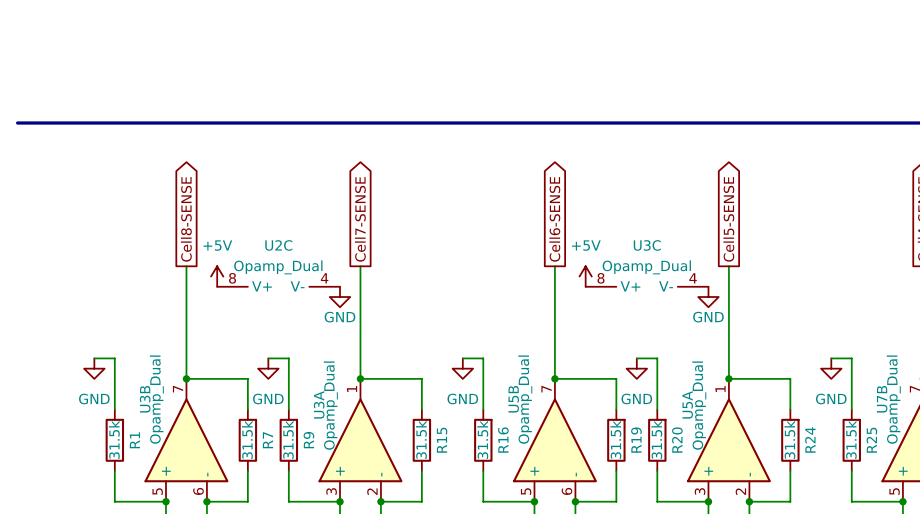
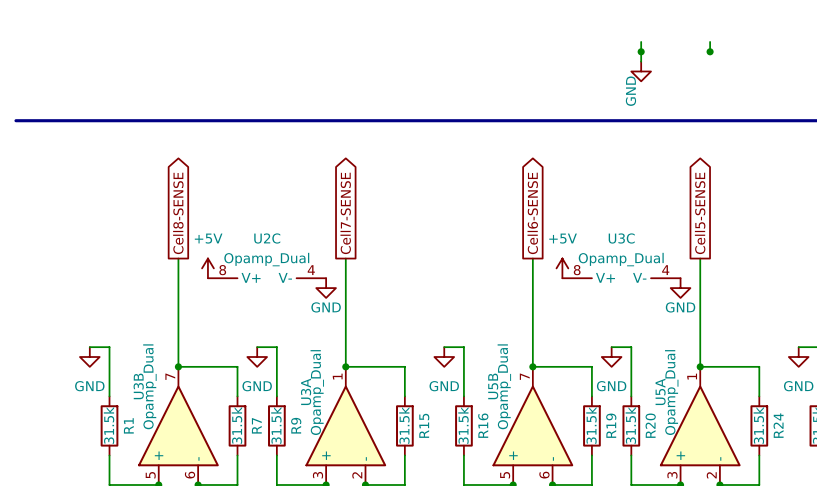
wire: none -> (641, 41) (641, 61)
wire: none -> (710, 41) (710, 51)
junction: none -> (641, 51)
junction: none -> (710, 51)
power symbol: none -> GND (641, 71)

